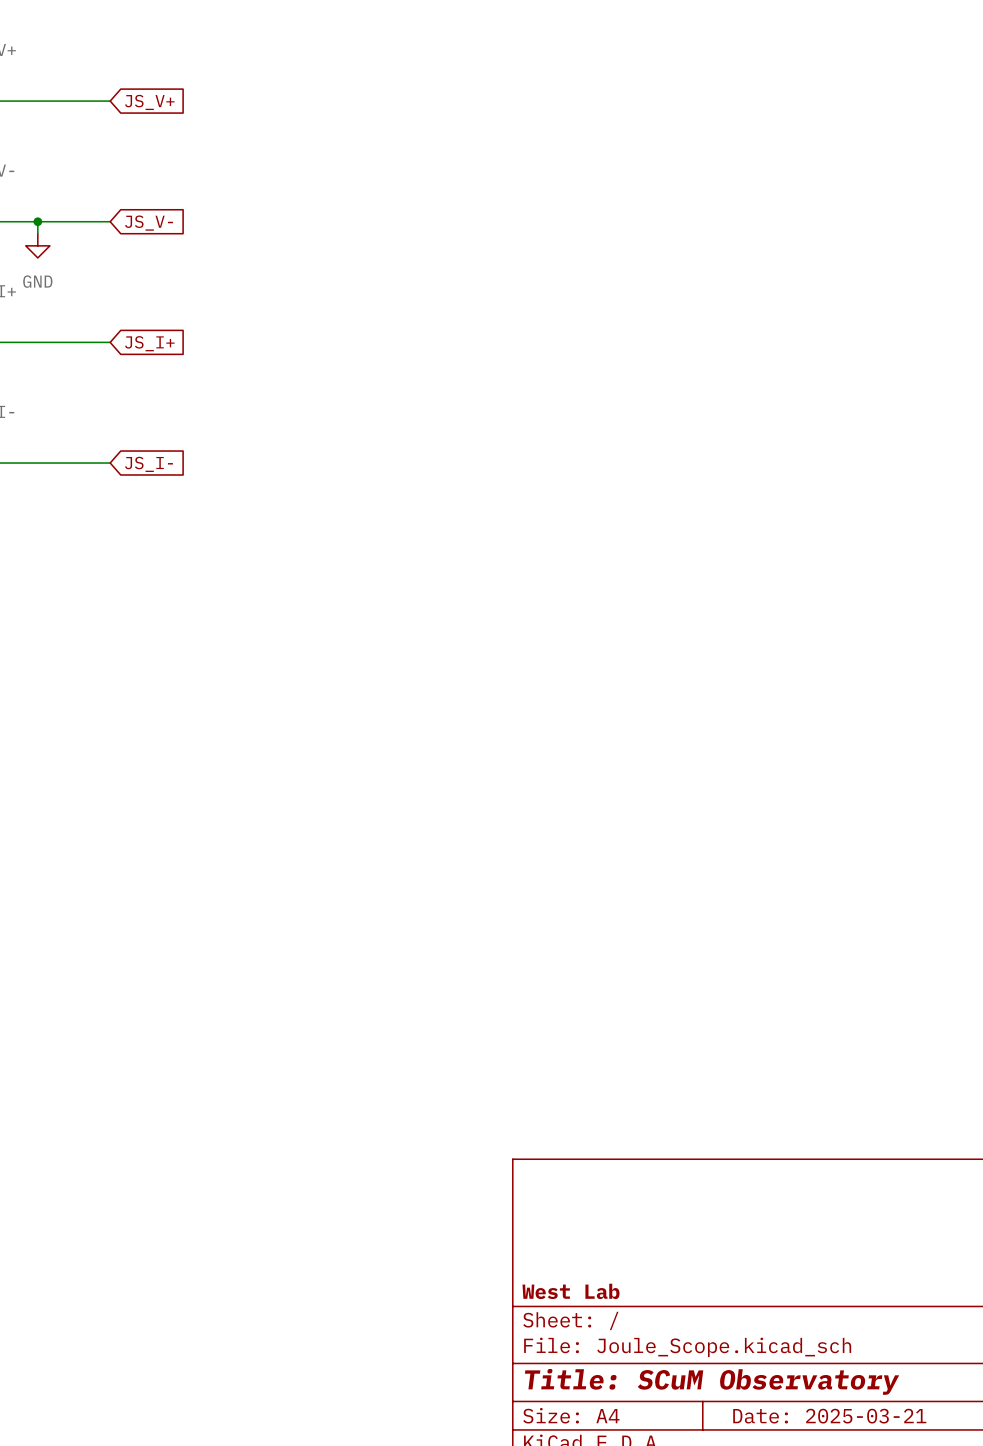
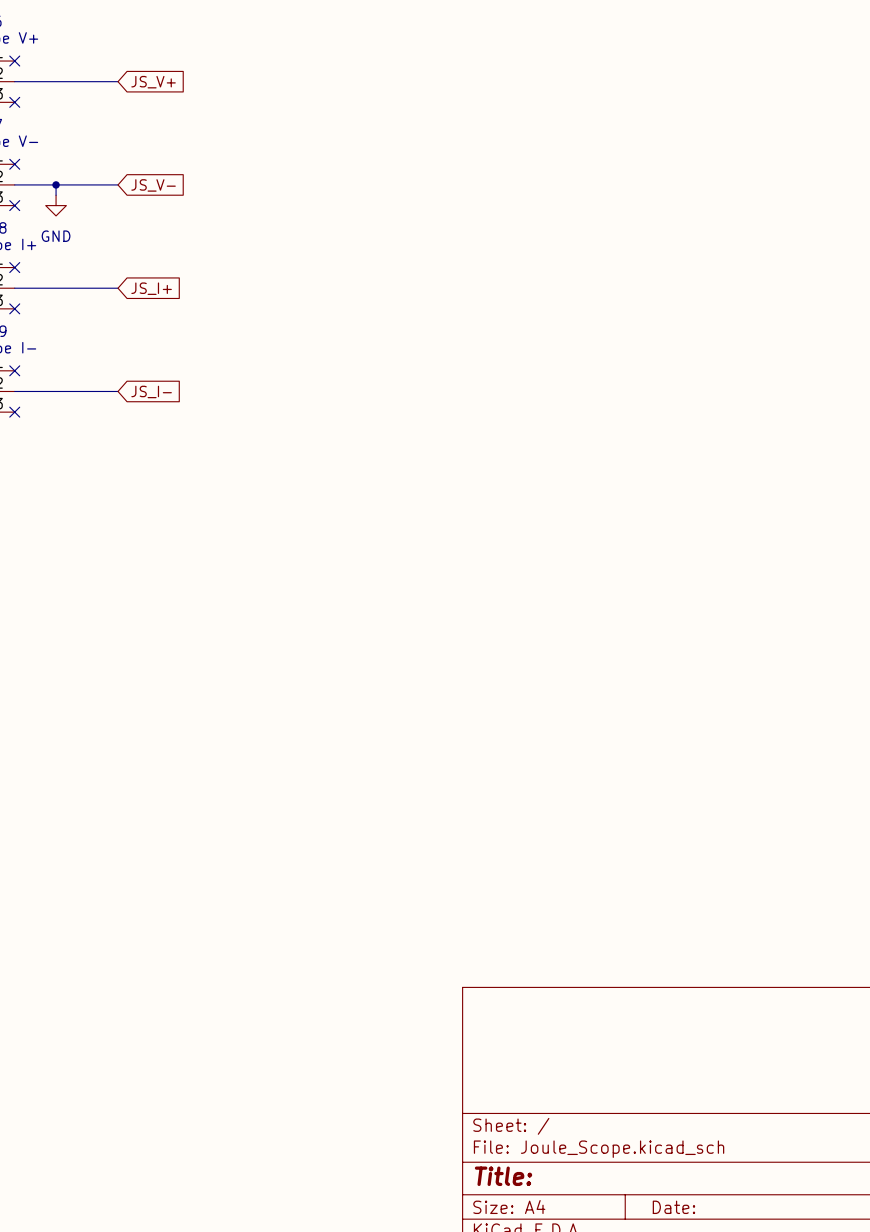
title block: West Lab (571, 1291) -> none
title block: Title: SCuM Observatory (712, 1381) -> Title: (503, 1176)
title block: Date: 2025-03-21 (829, 1416) -> Date: (673, 1207)

